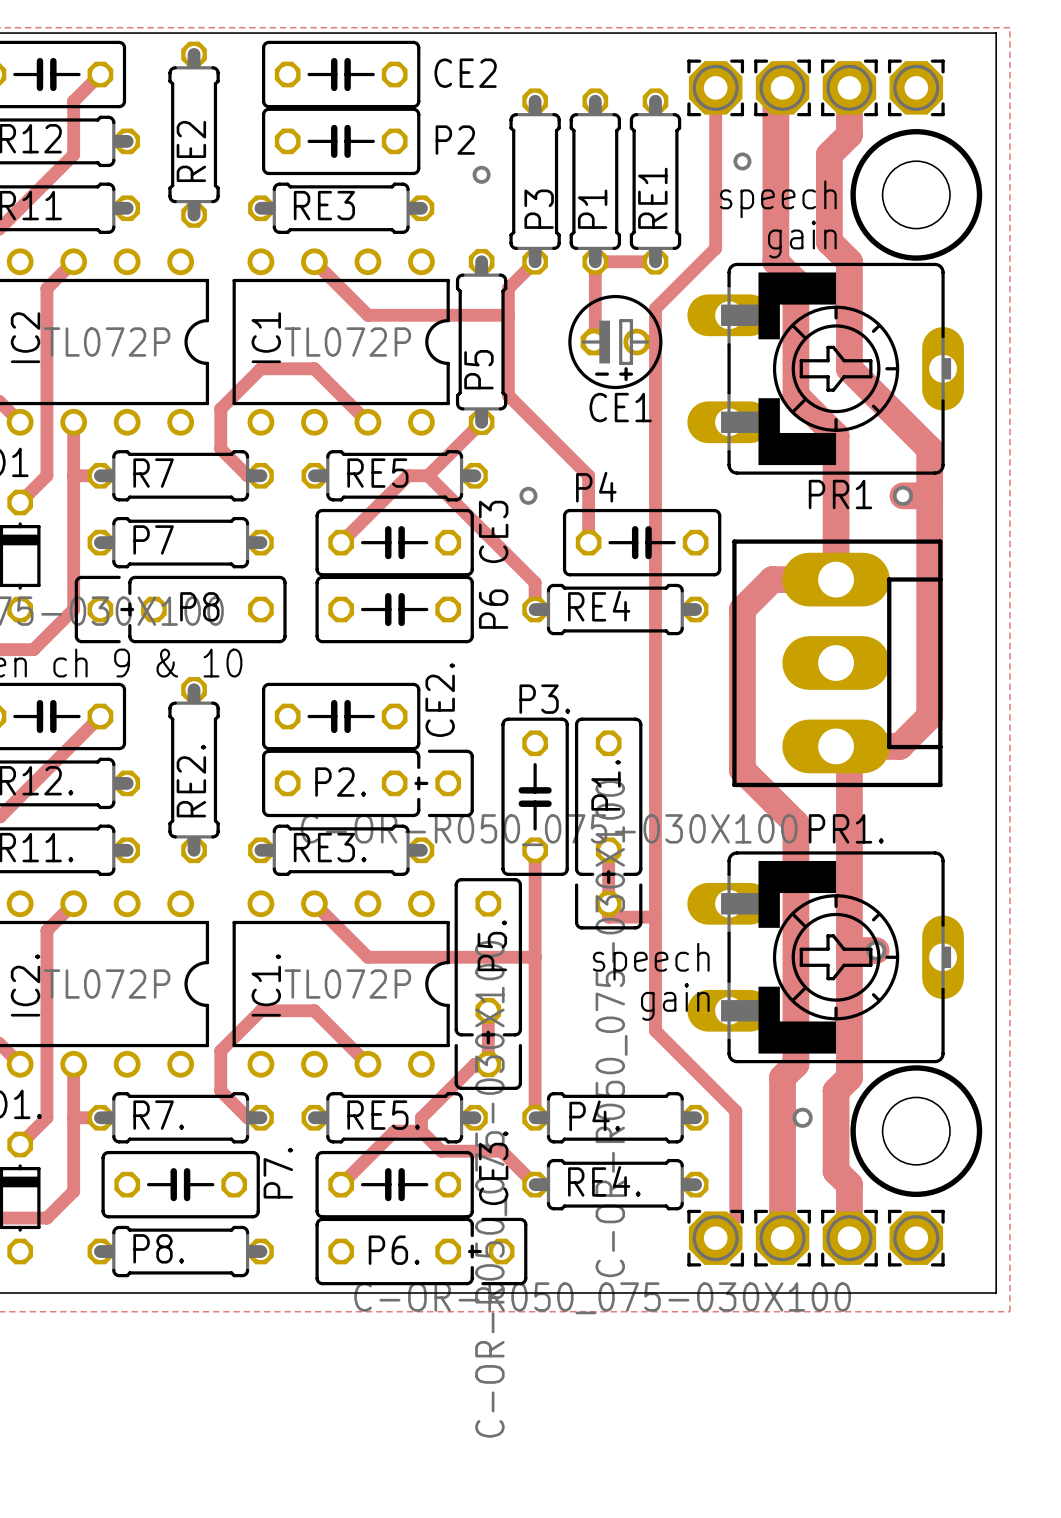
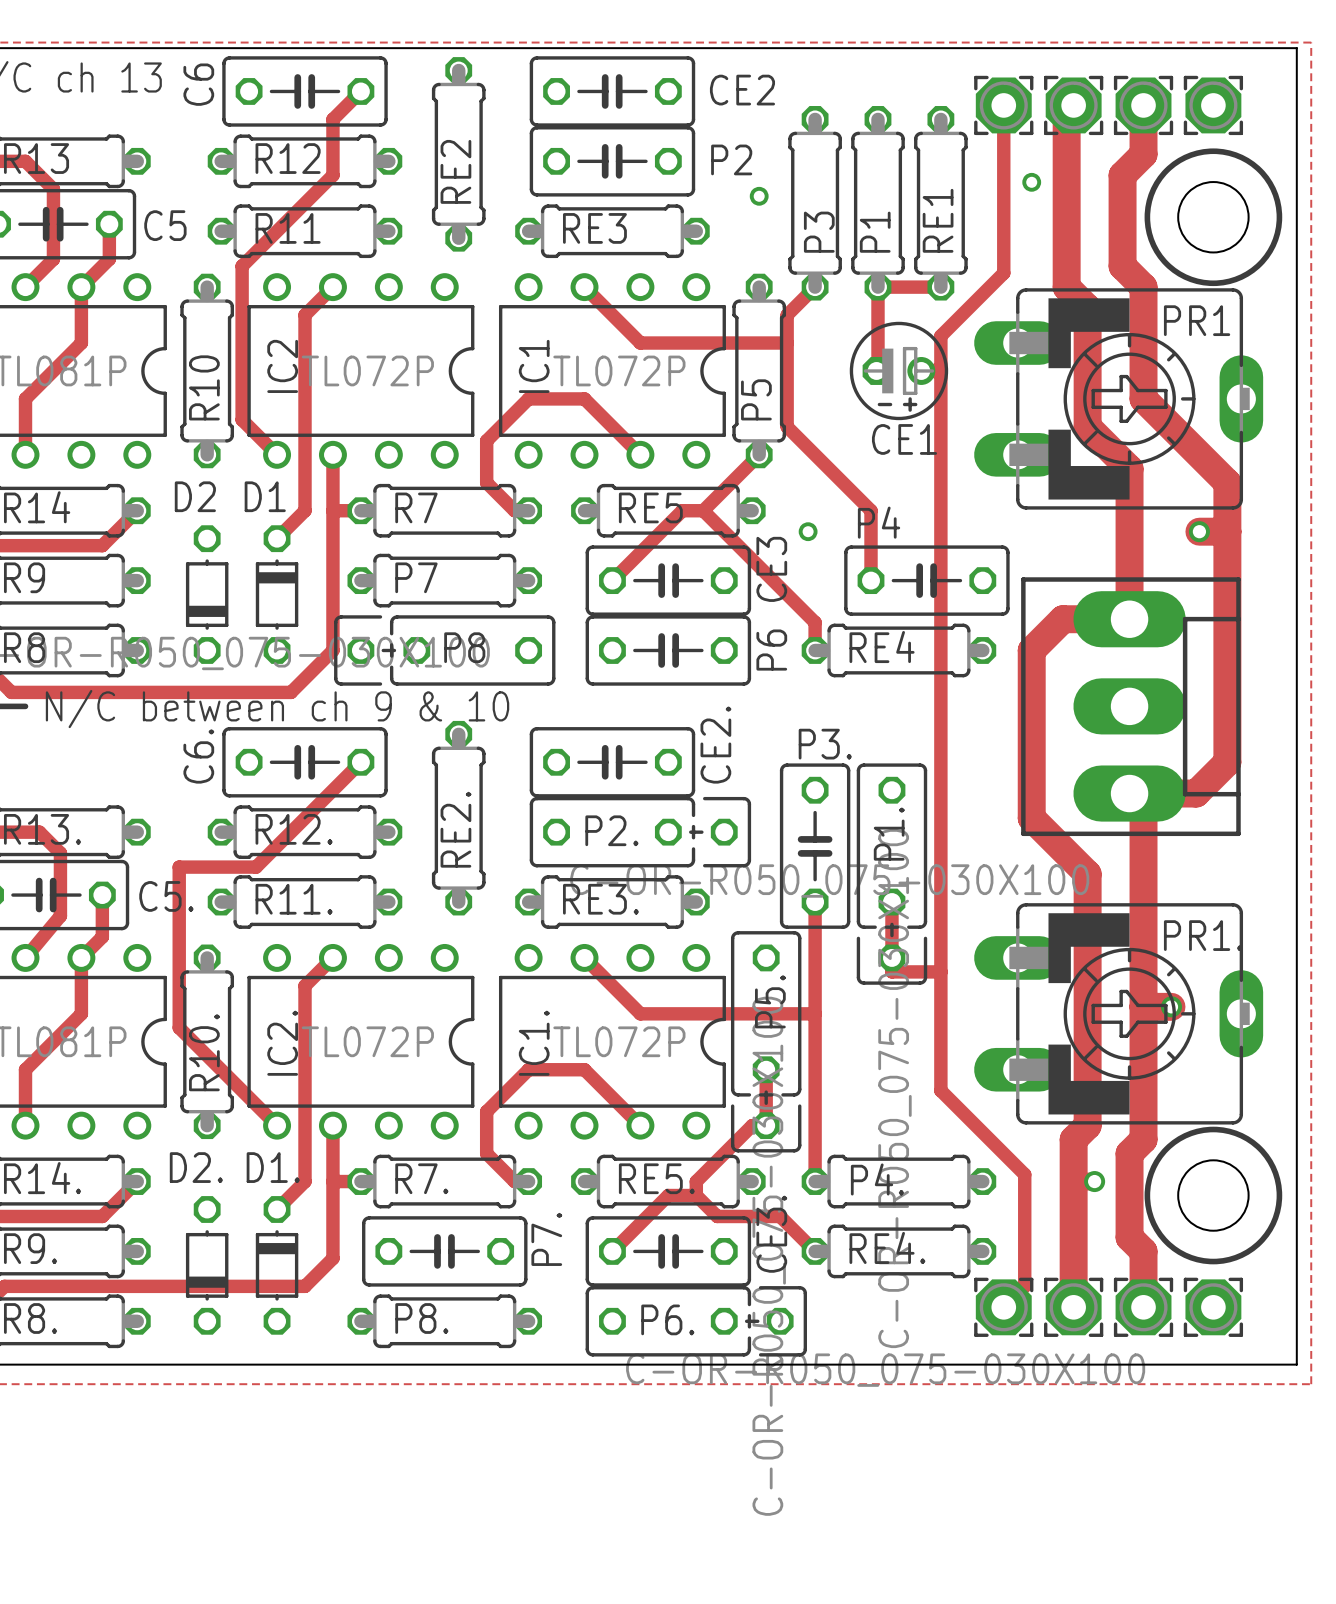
text: speech (778, 199) -> none
text: gain (802, 239) -> none
PR1 name position: PR1 (840, 494) -> PR1 (1197, 320)
PR1. name position: PR1. (846, 828) -> PR1. (1203, 935)
text: speech (651, 961) -> none
text: gain (675, 1001) -> none

